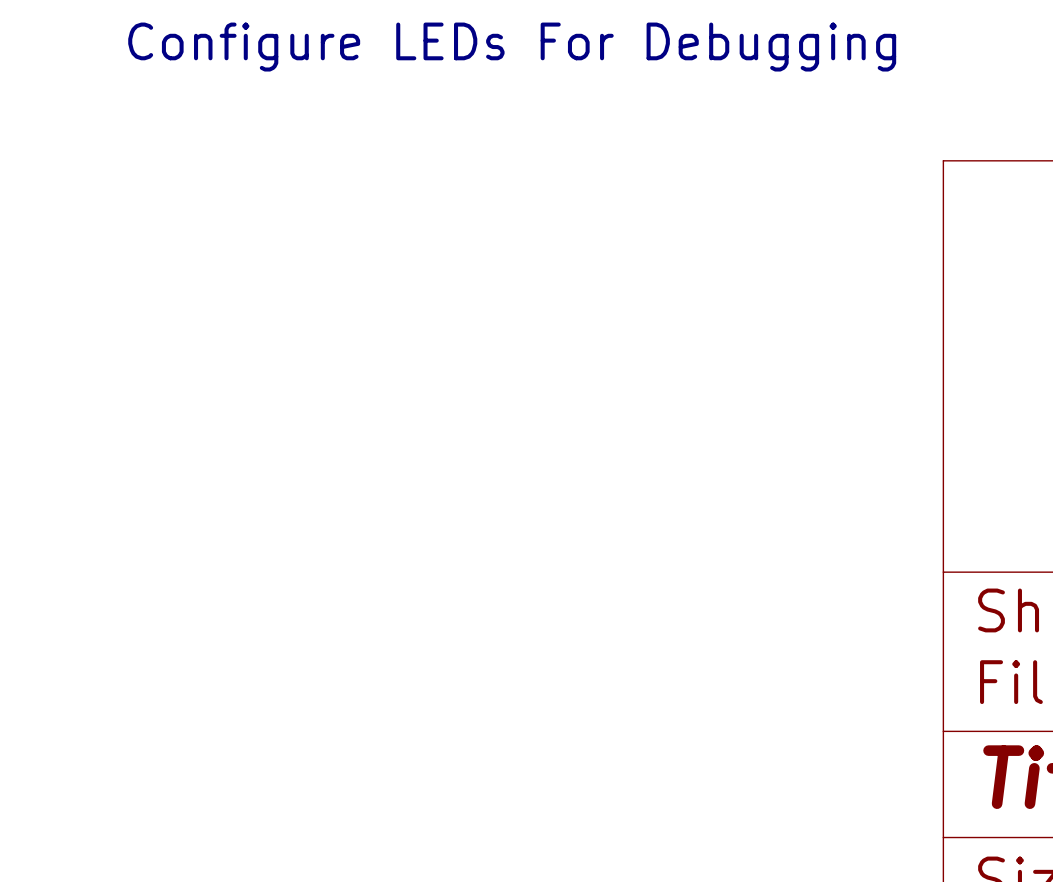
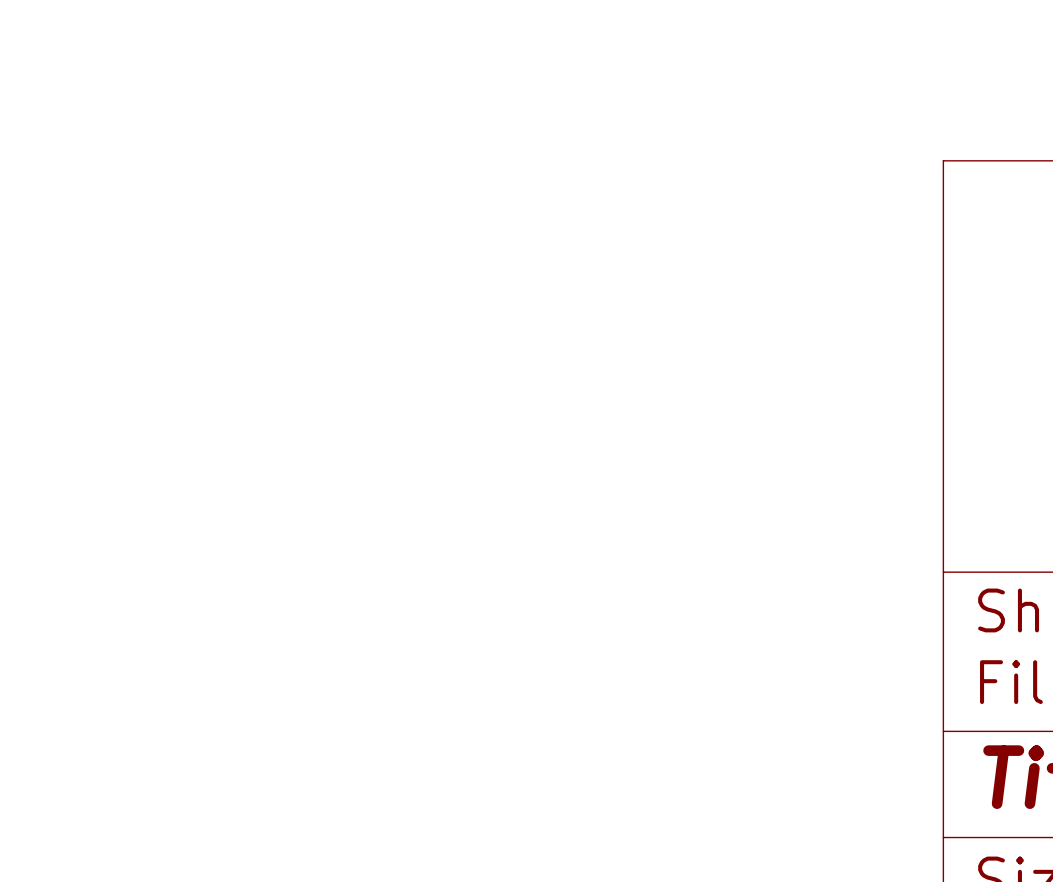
text: Configure LEDs For Debugging (512, 47) -> none

